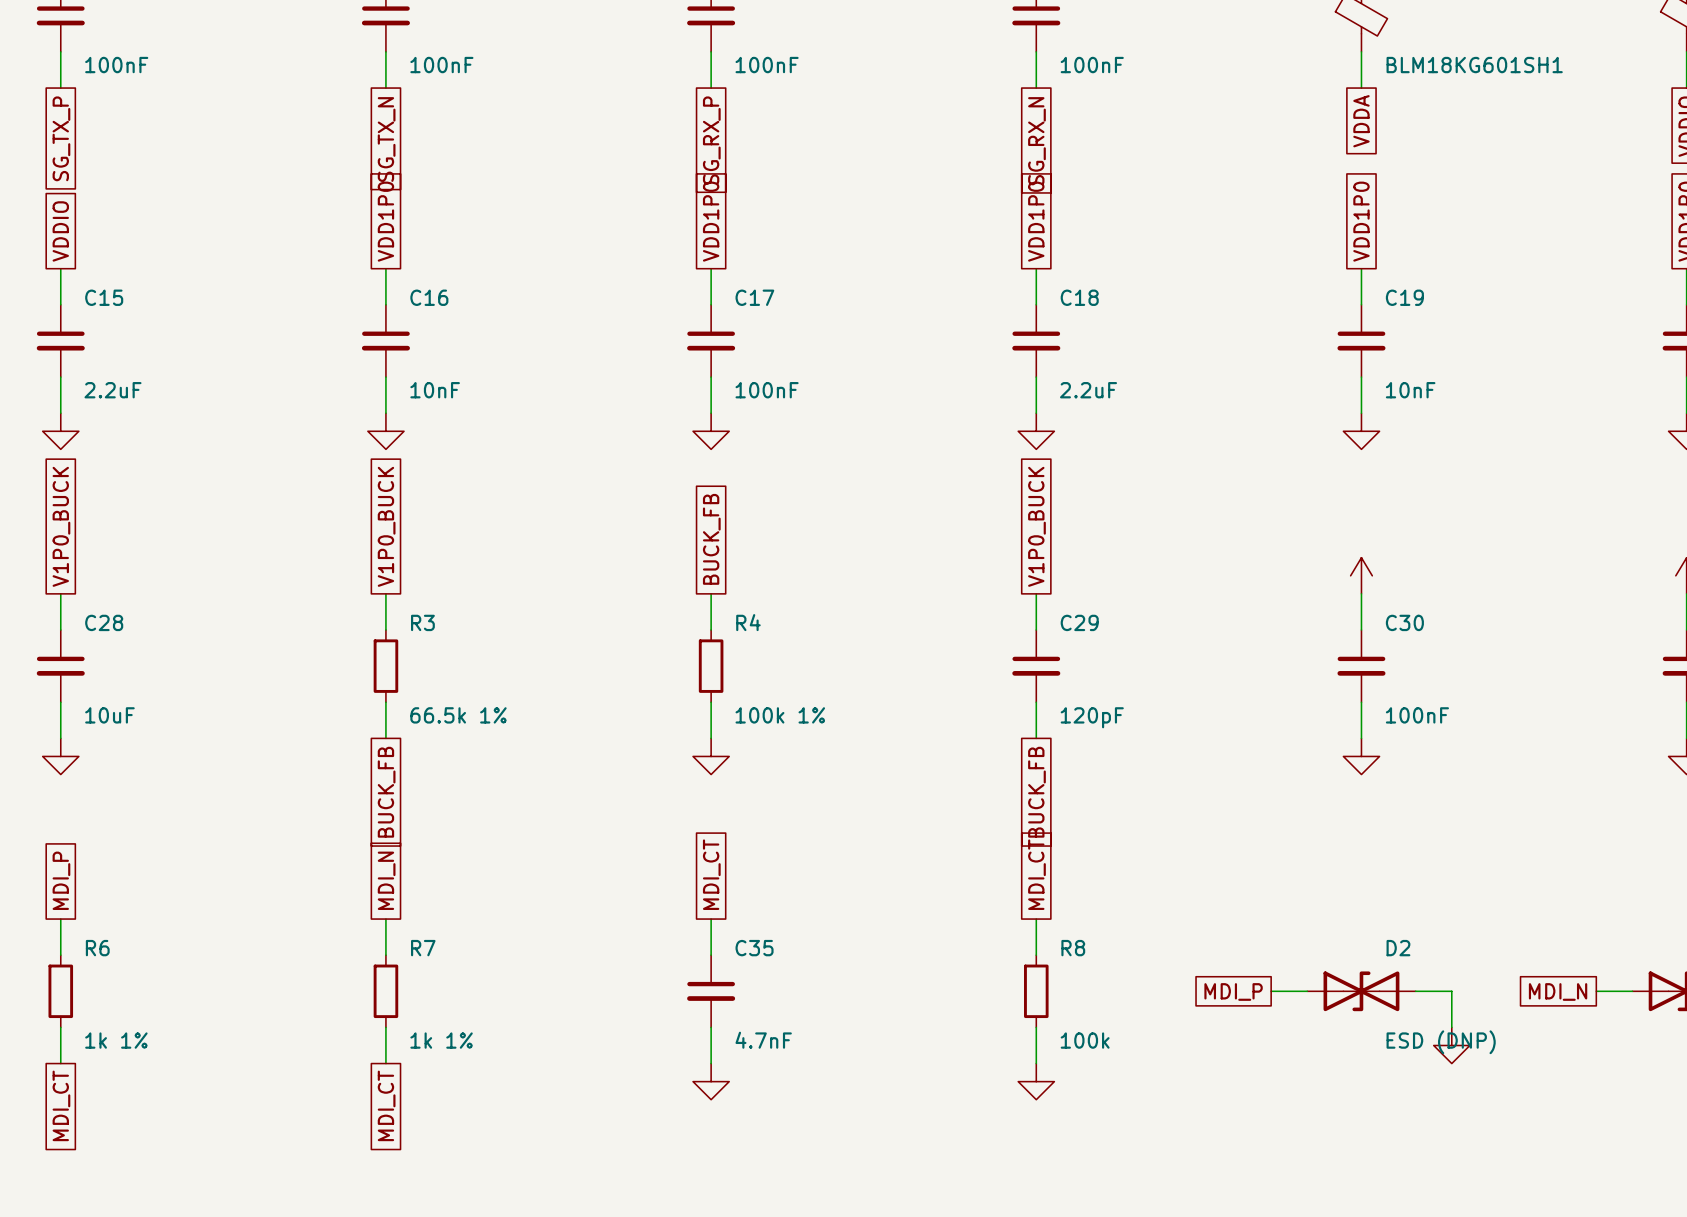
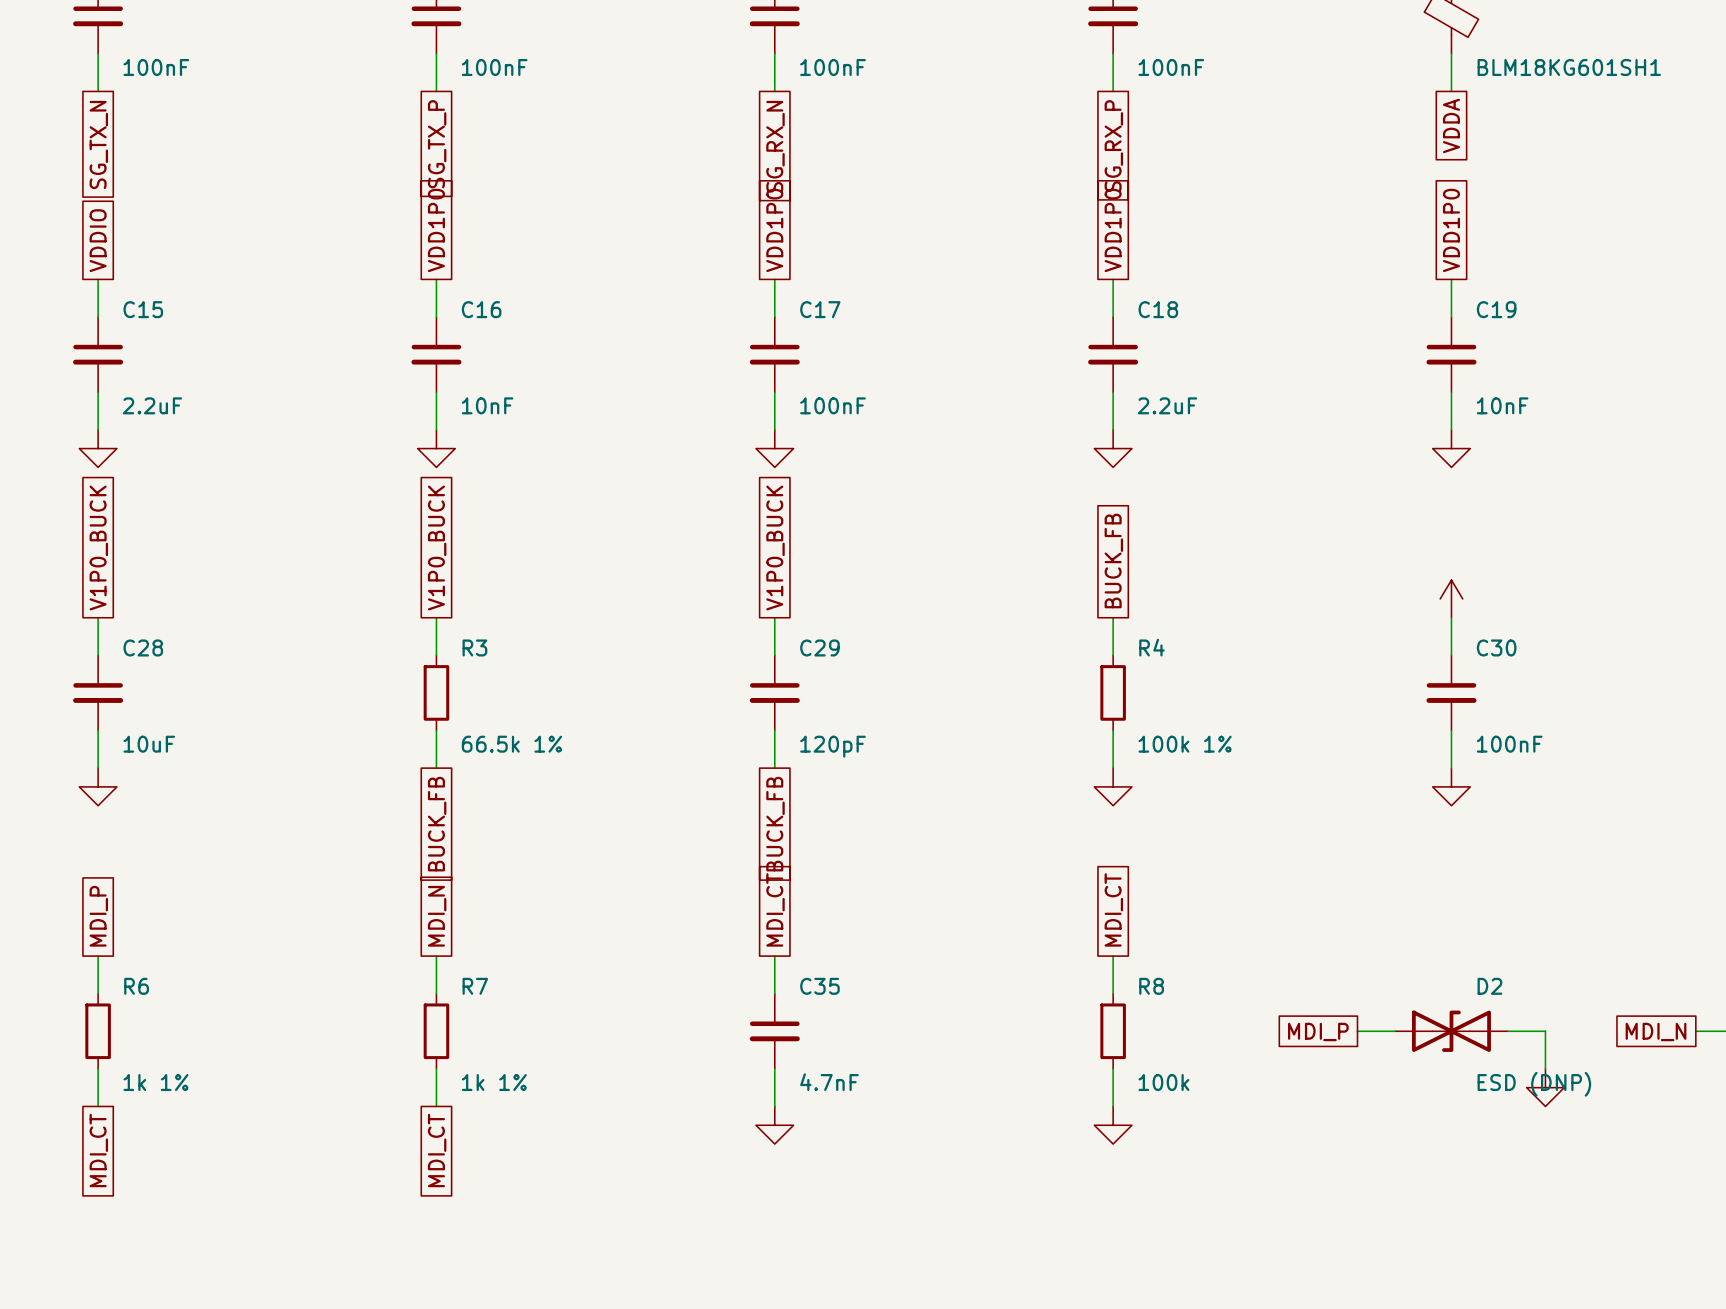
global label: SG_TX_P (61, 138) -> SG_TX_N (98, 144)
global label: SG_TX_N (386, 139) -> SG_TX_P (437, 144)
global label: SG_RX_P (711, 140) -> SG_RX_N (775, 146)
global label: SG_RX_N (1036, 141) -> SG_RX_P (1113, 146)
global label: V1P0_BUCK (1036, 526) -> BUCK_FB (1113, 561)
global label: BUCK_FB (711, 539) -> V1P0_BUCK (775, 547)
R4 position: (711, 666) -> (1113, 692)
C29 position: (1036, 666) -> (774, 692)
power symbol position: (711, 756) -> (1113, 786)
global label position: BUCK_FB (1036, 792) -> BUCK_FB (775, 824)

